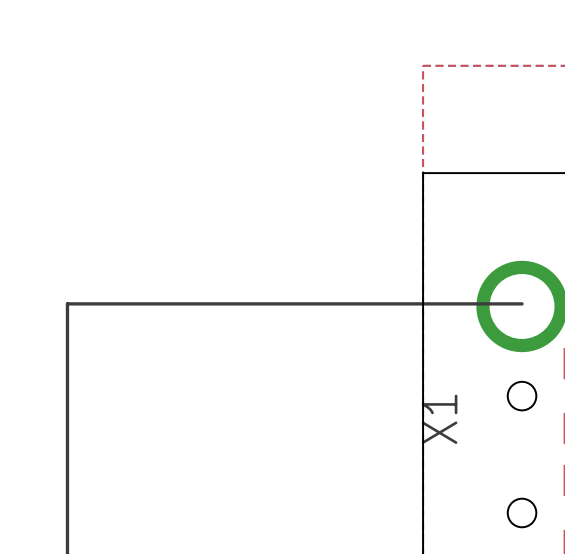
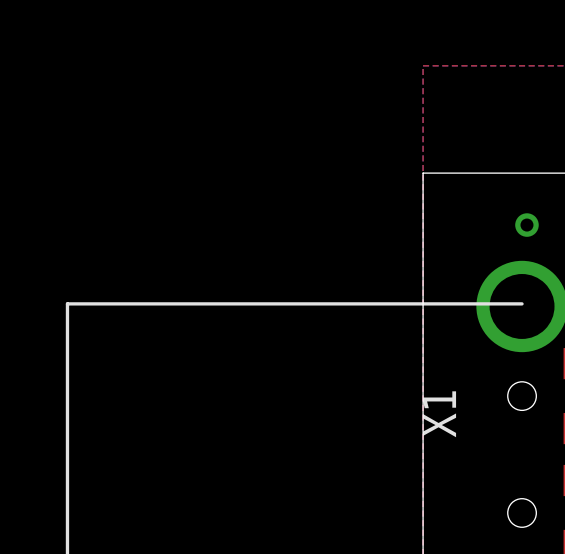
via: none -> (526, 225)

